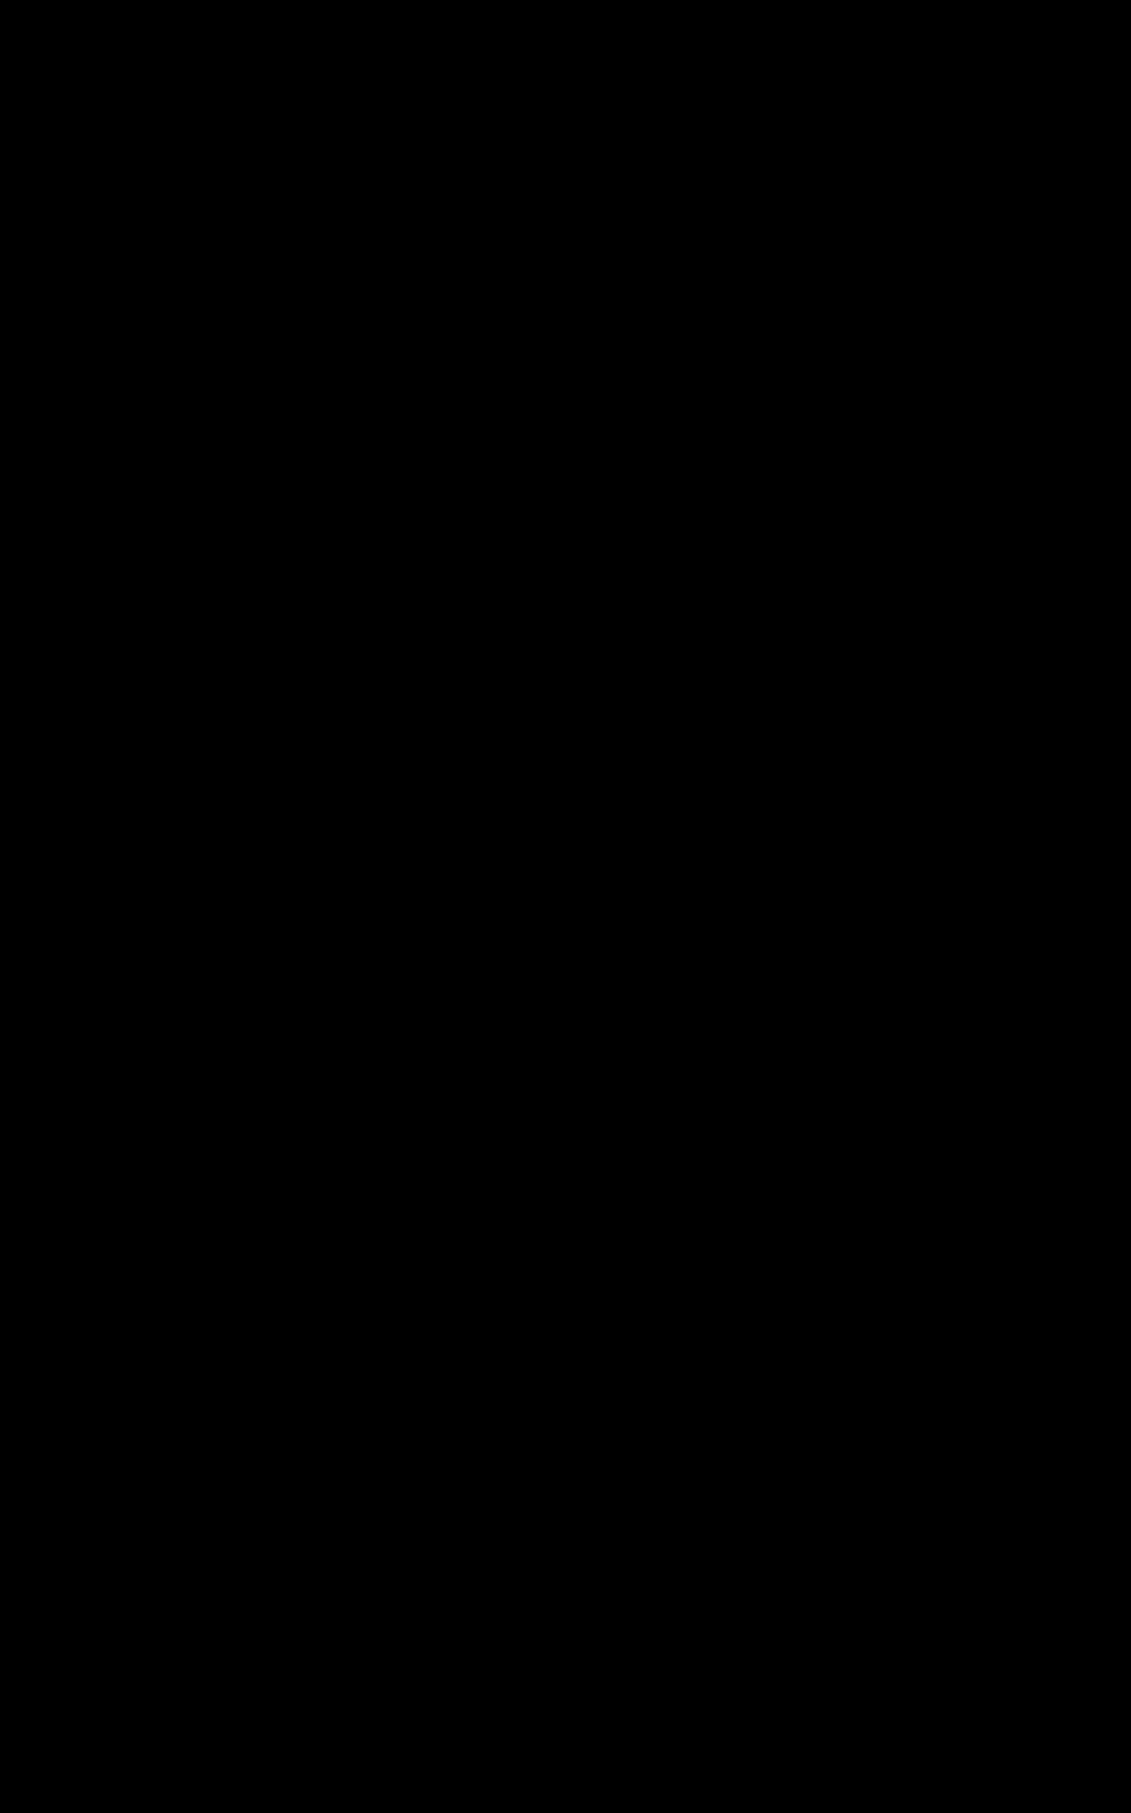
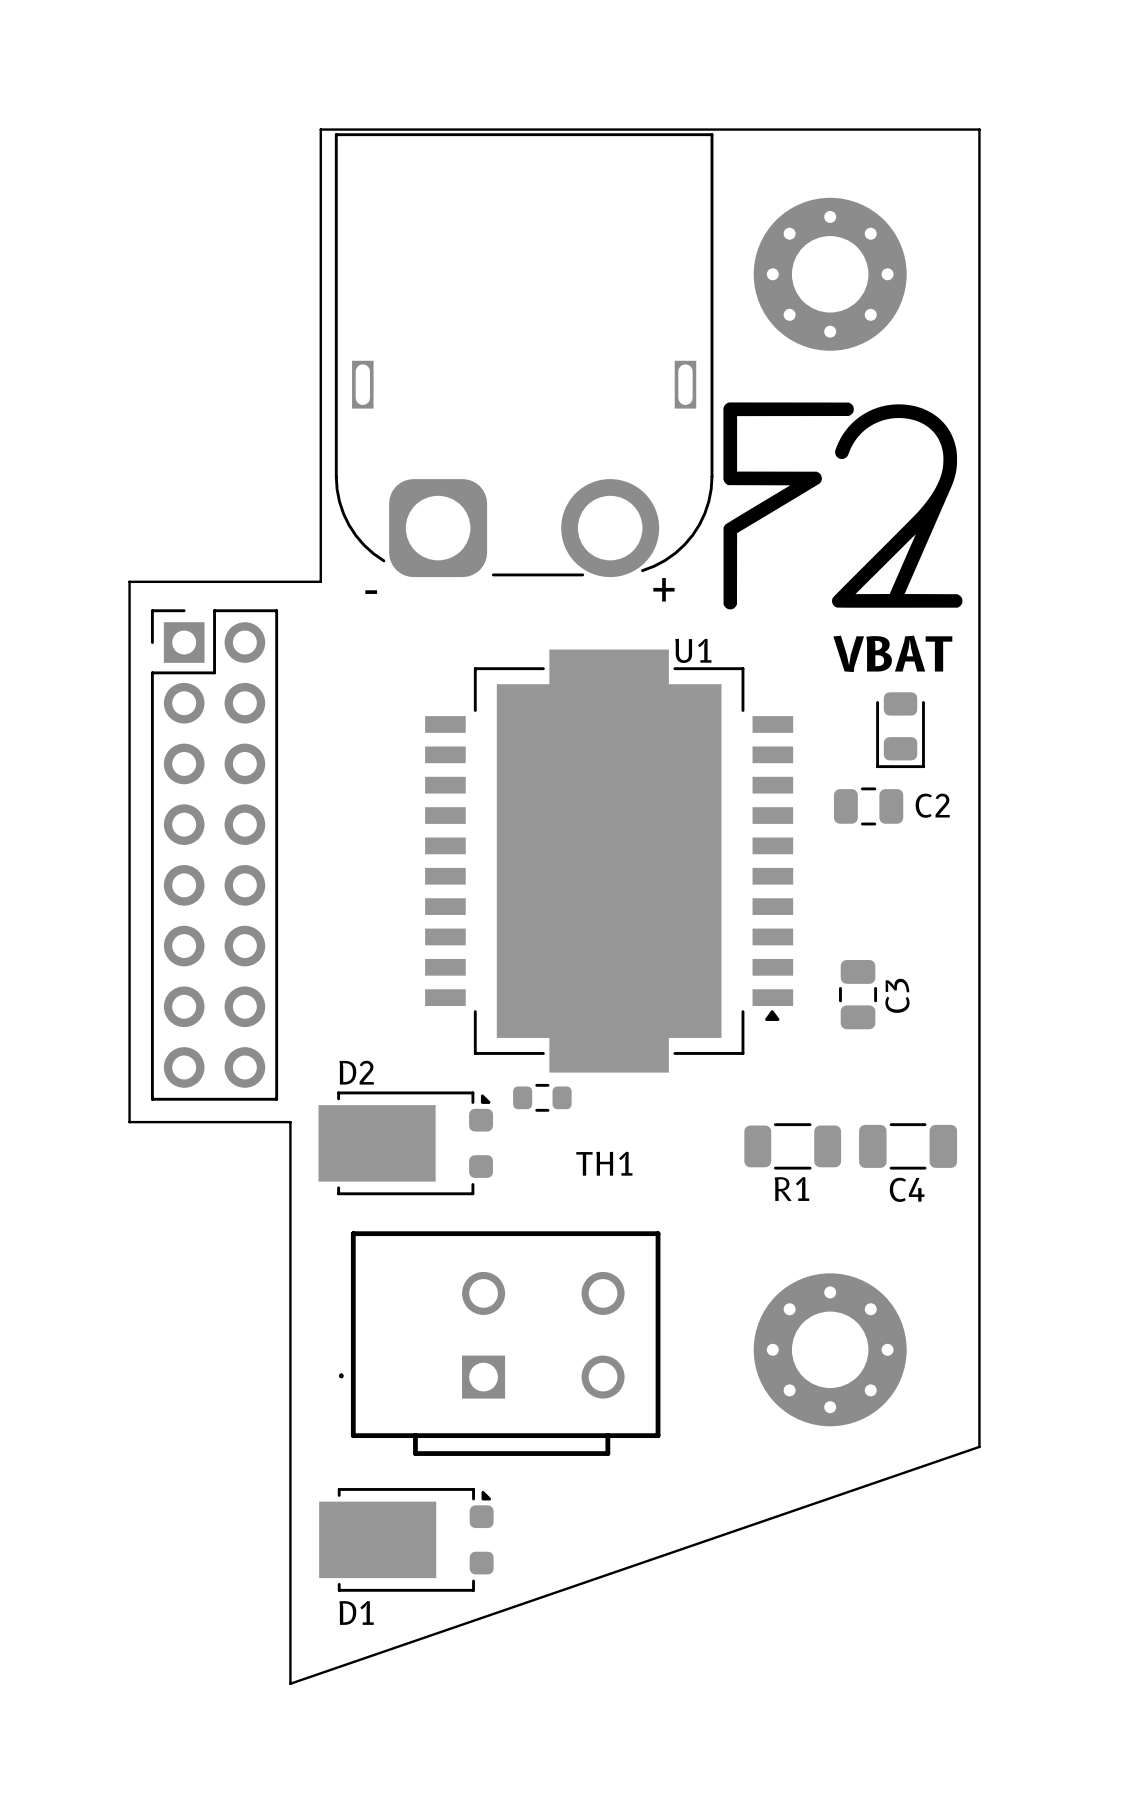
board edge: none -> (320, 129) (979, 129) (979, 1446) (290, 1683) (290, 1122) (129, 1122) (129, 581) (320, 581) (320, 129)
part: none -> (830, 274)
part: none -> (524, 355)
drawing: none -> [723, 402, 963, 610]
text: none -> VBAT (892, 653)
part: none -> (900, 730)
C2: none -> (868, 806)
part: none -> (214, 855)
U1: none -> (609, 861)
C3: none -> (858, 994)
TH1: none -> (542, 1097)
D2: none -> (405, 1143)
R1: none -> (792, 1146)
C4: none -> (908, 1146)
part: none -> (499, 1343)
part: none -> (830, 1349)
D1: none -> (406, 1539)

